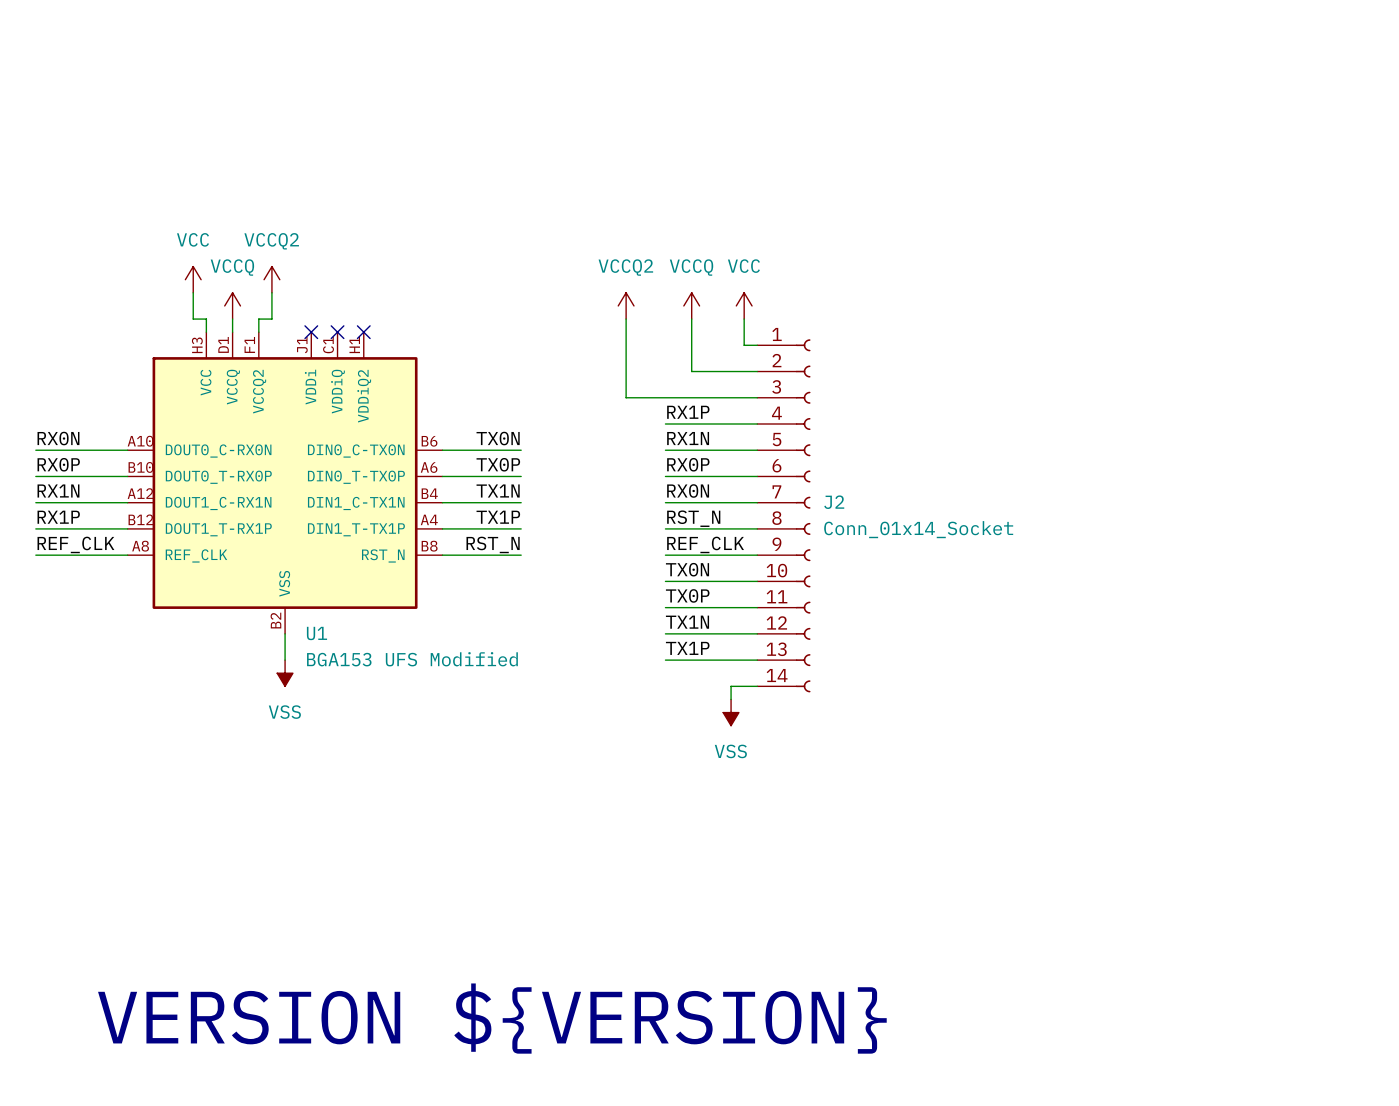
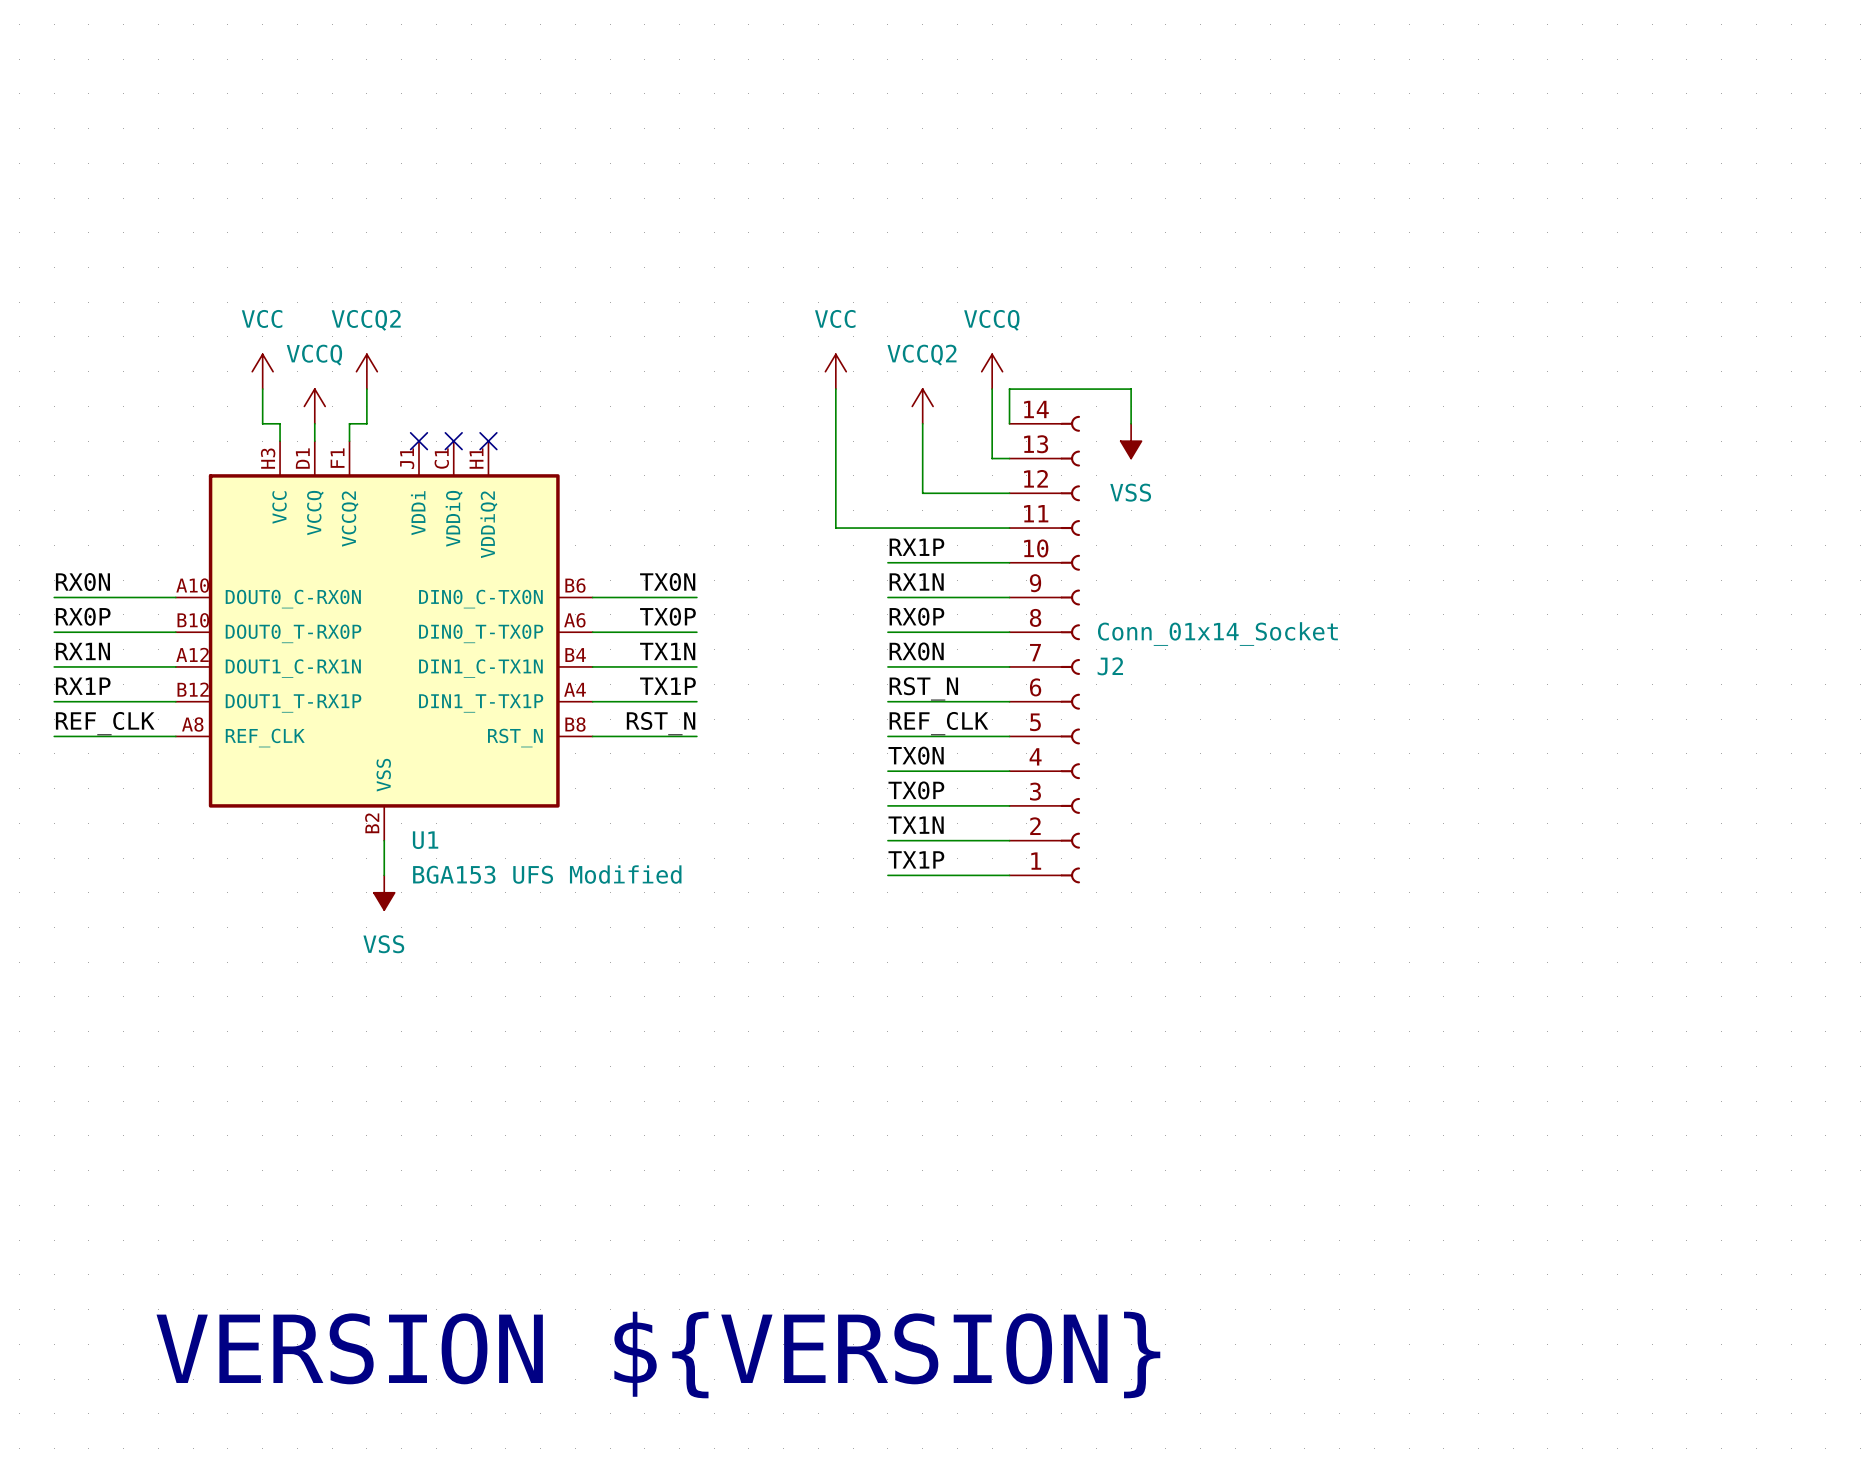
power symbol: none -> VCCQ (992, 371)
power symbol: VCCQ2 (626, 305) -> none
power symbol: VCCQ (691, 305) -> VCCQ2 (922, 406)
power symbol position: VCC (744, 305) -> VCC (835, 371)
wire: none -> (1009, 423) (1009, 389) (1131, 389) (1131, 423)
power symbol: none -> VSS (1131, 441)
J2 flip: as is (803, 515) -> up-down (1070, 649)
wire: (757, 686) (731, 686) (731, 699) -> none
power symbol: VSS (731, 712) -> none

